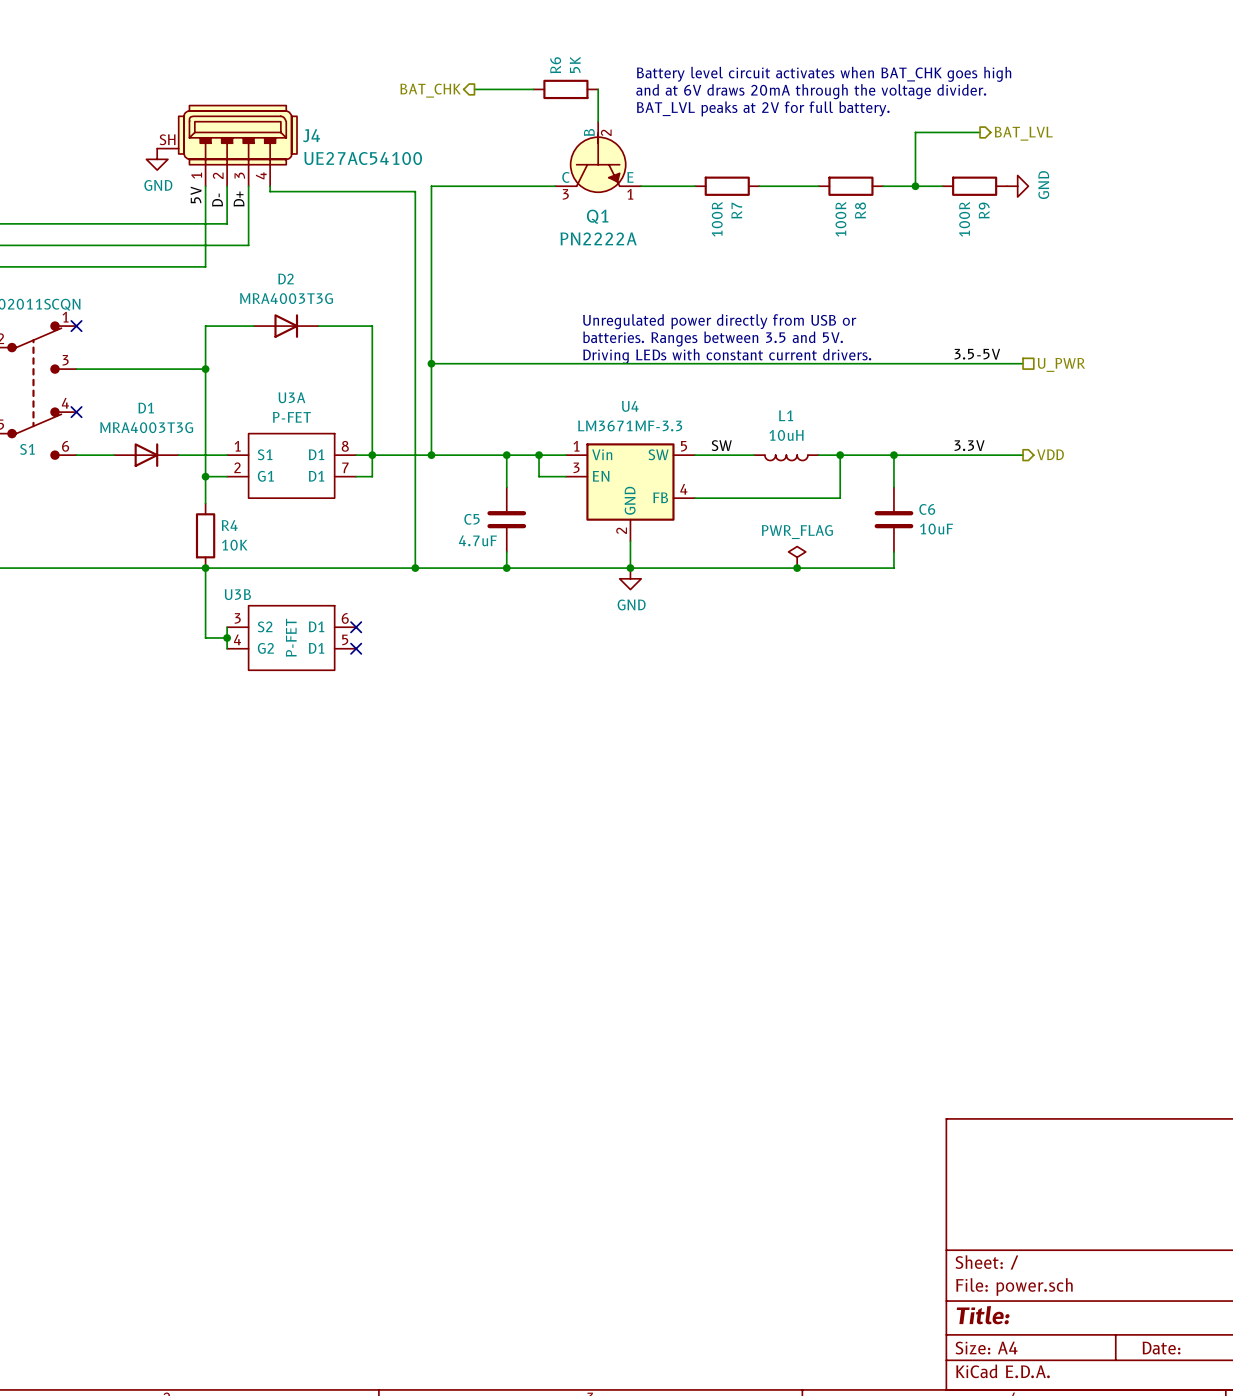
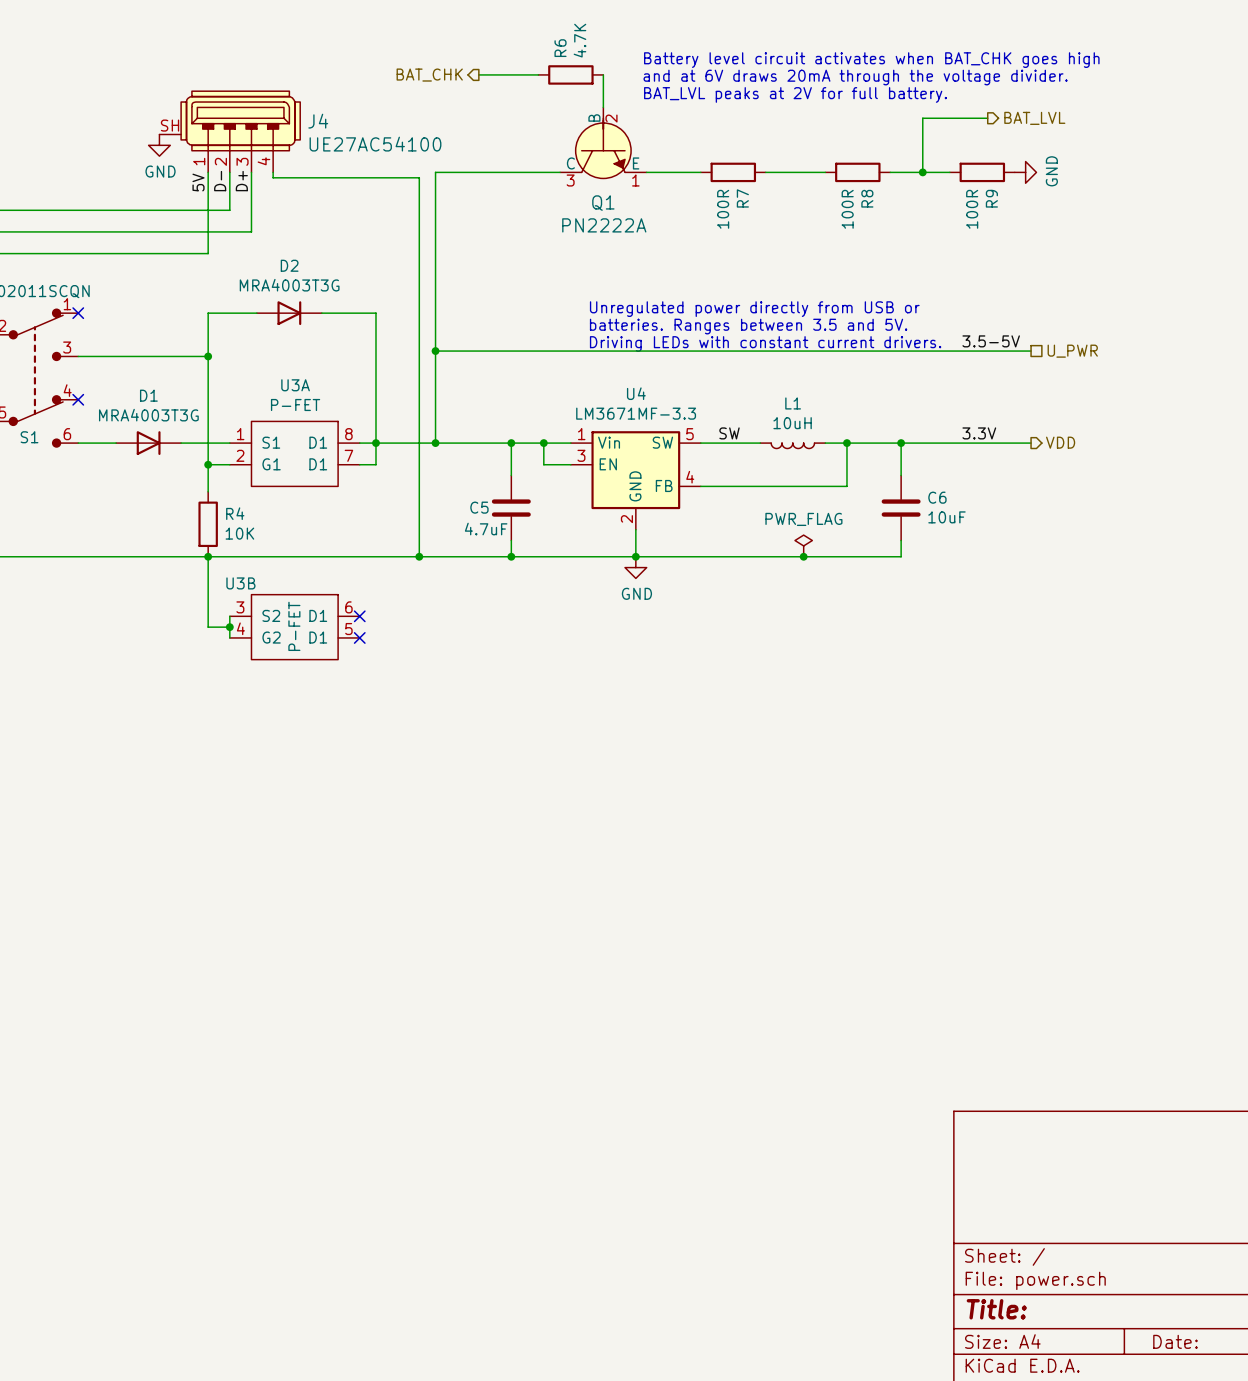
R6 value: 5K (575, 64) -> 4.7K (579, 40)

